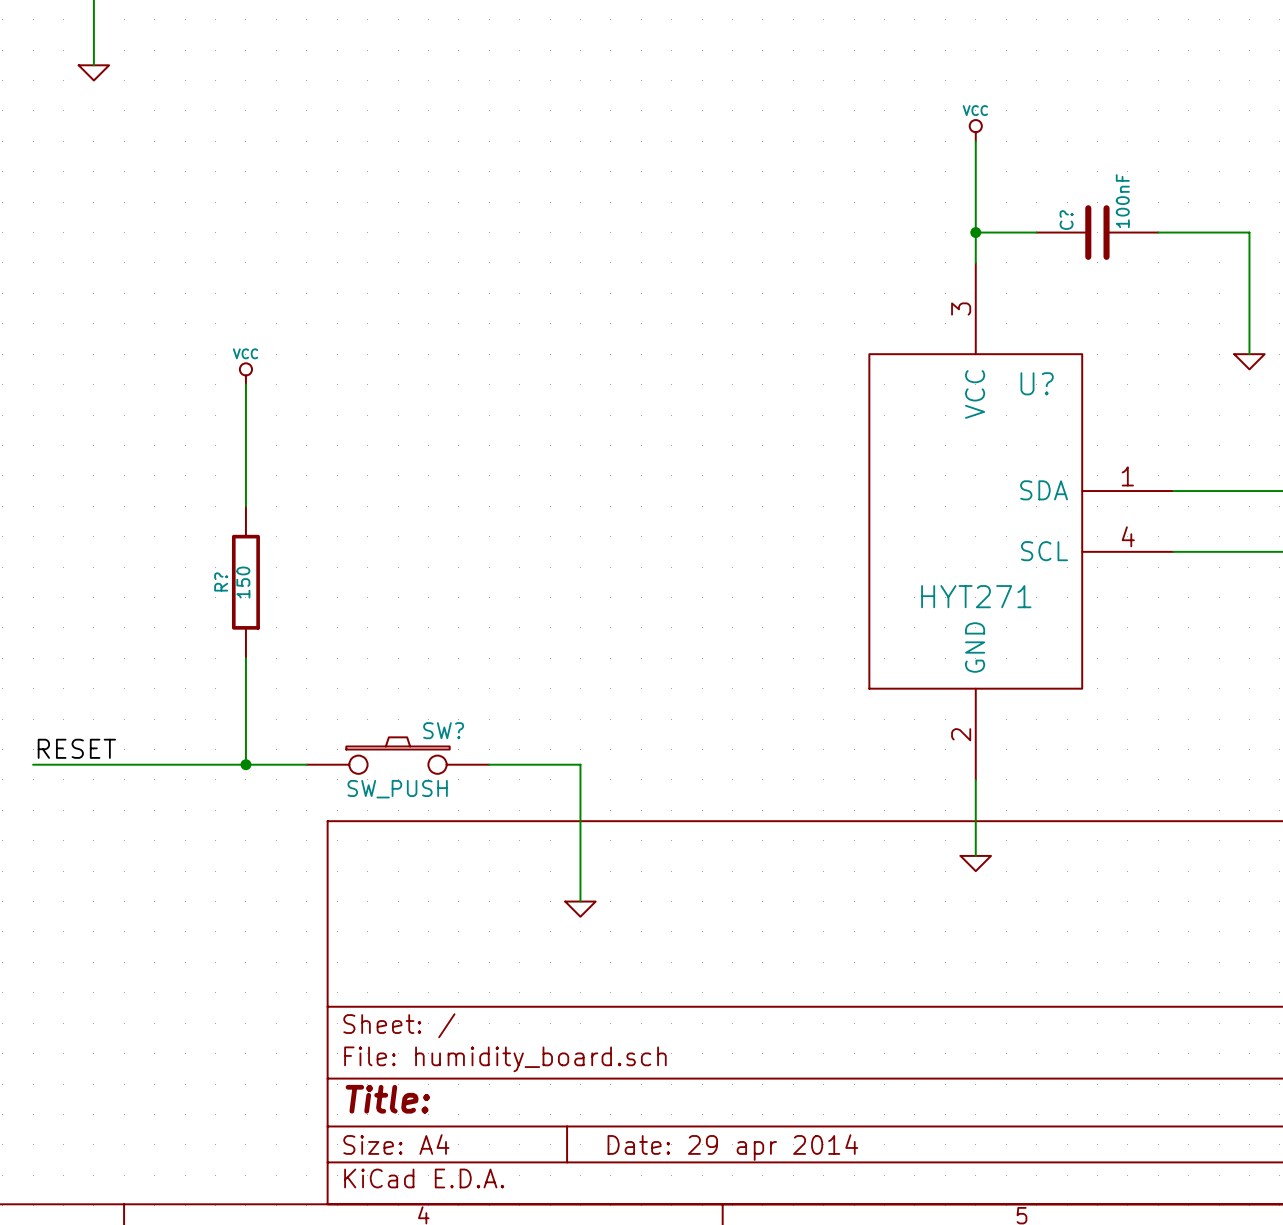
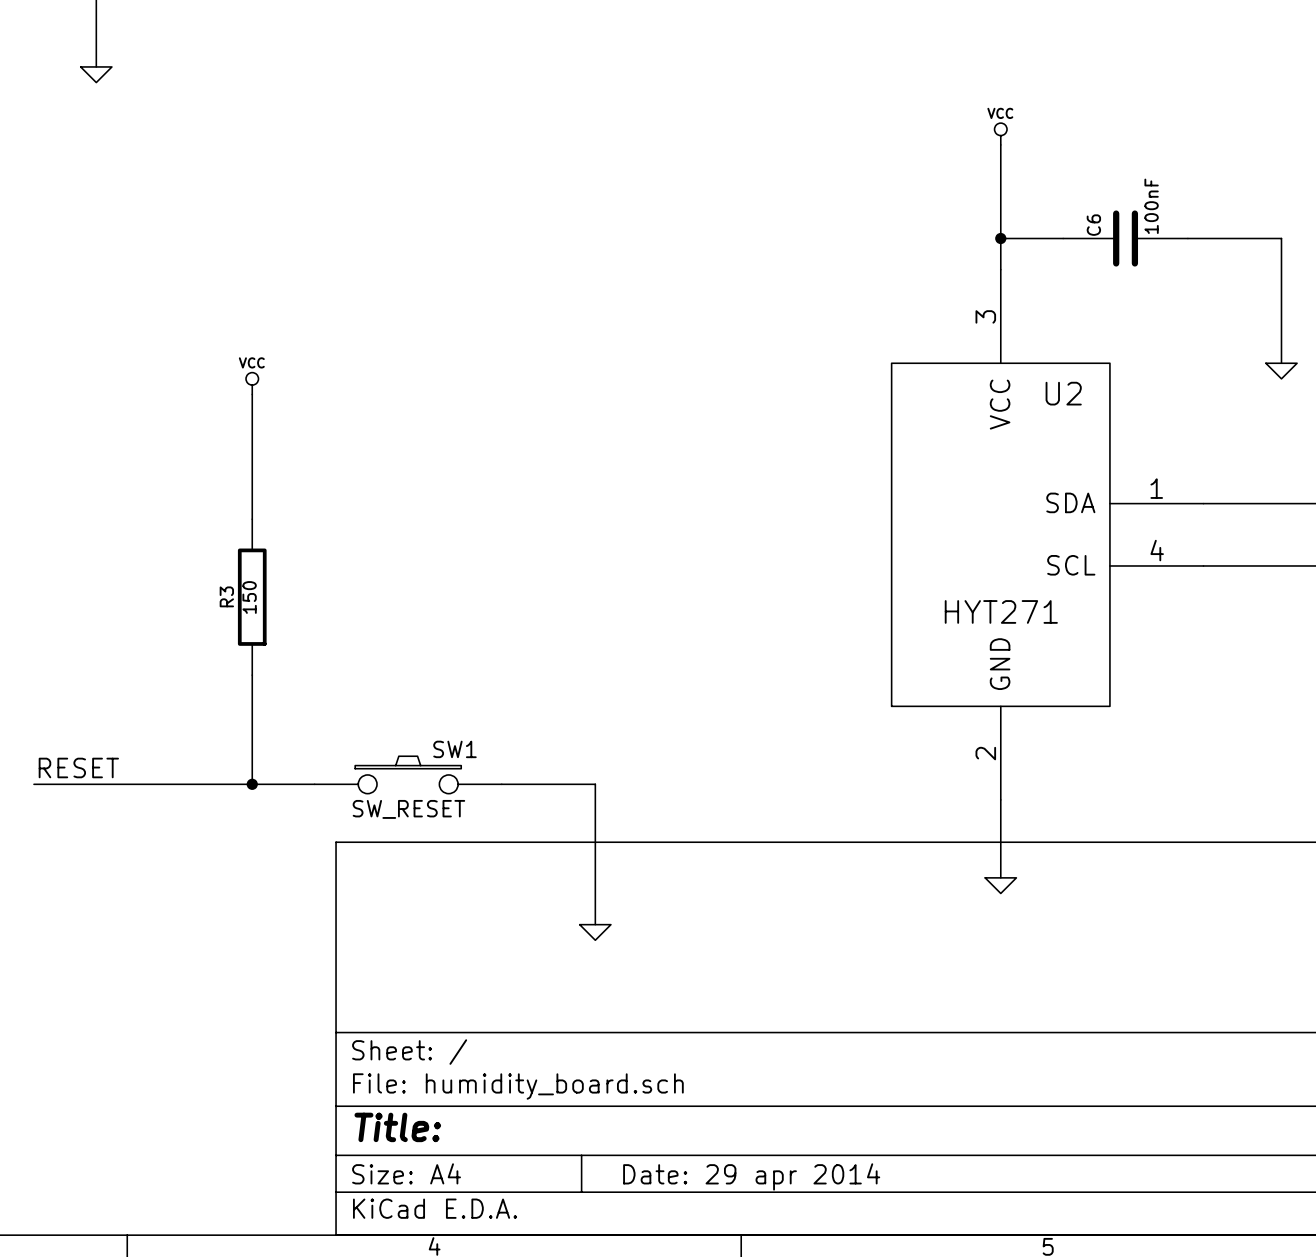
C? name: C? (1066, 220) -> C6 (1093, 225)
U? name: U? (1037, 383) -> U2 (1063, 393)
R? name: R? (221, 581) -> R3 (226, 596)
SW? name: SW? (443, 730) -> SW1 (454, 749)
SW? value: SW_PUSH (397, 789) -> SW_RESET (408, 809)

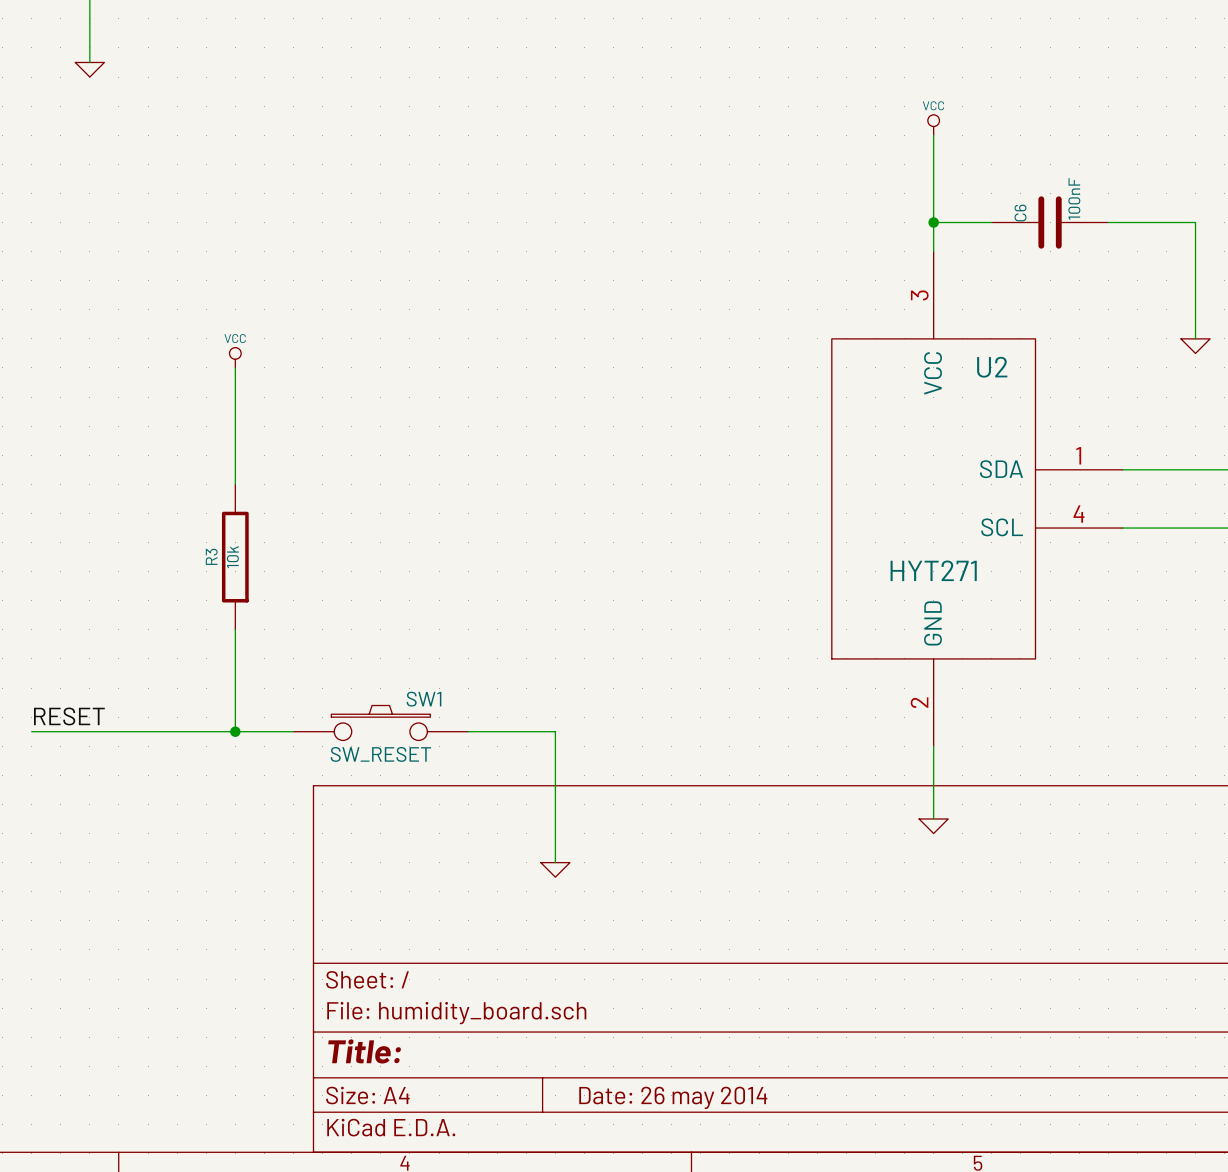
R3 value: 150 (249, 597) -> 10k (232, 557)
title block: Date: 29 apr 2014 (751, 1176) -> Date: 26 may 2014 (673, 1097)

